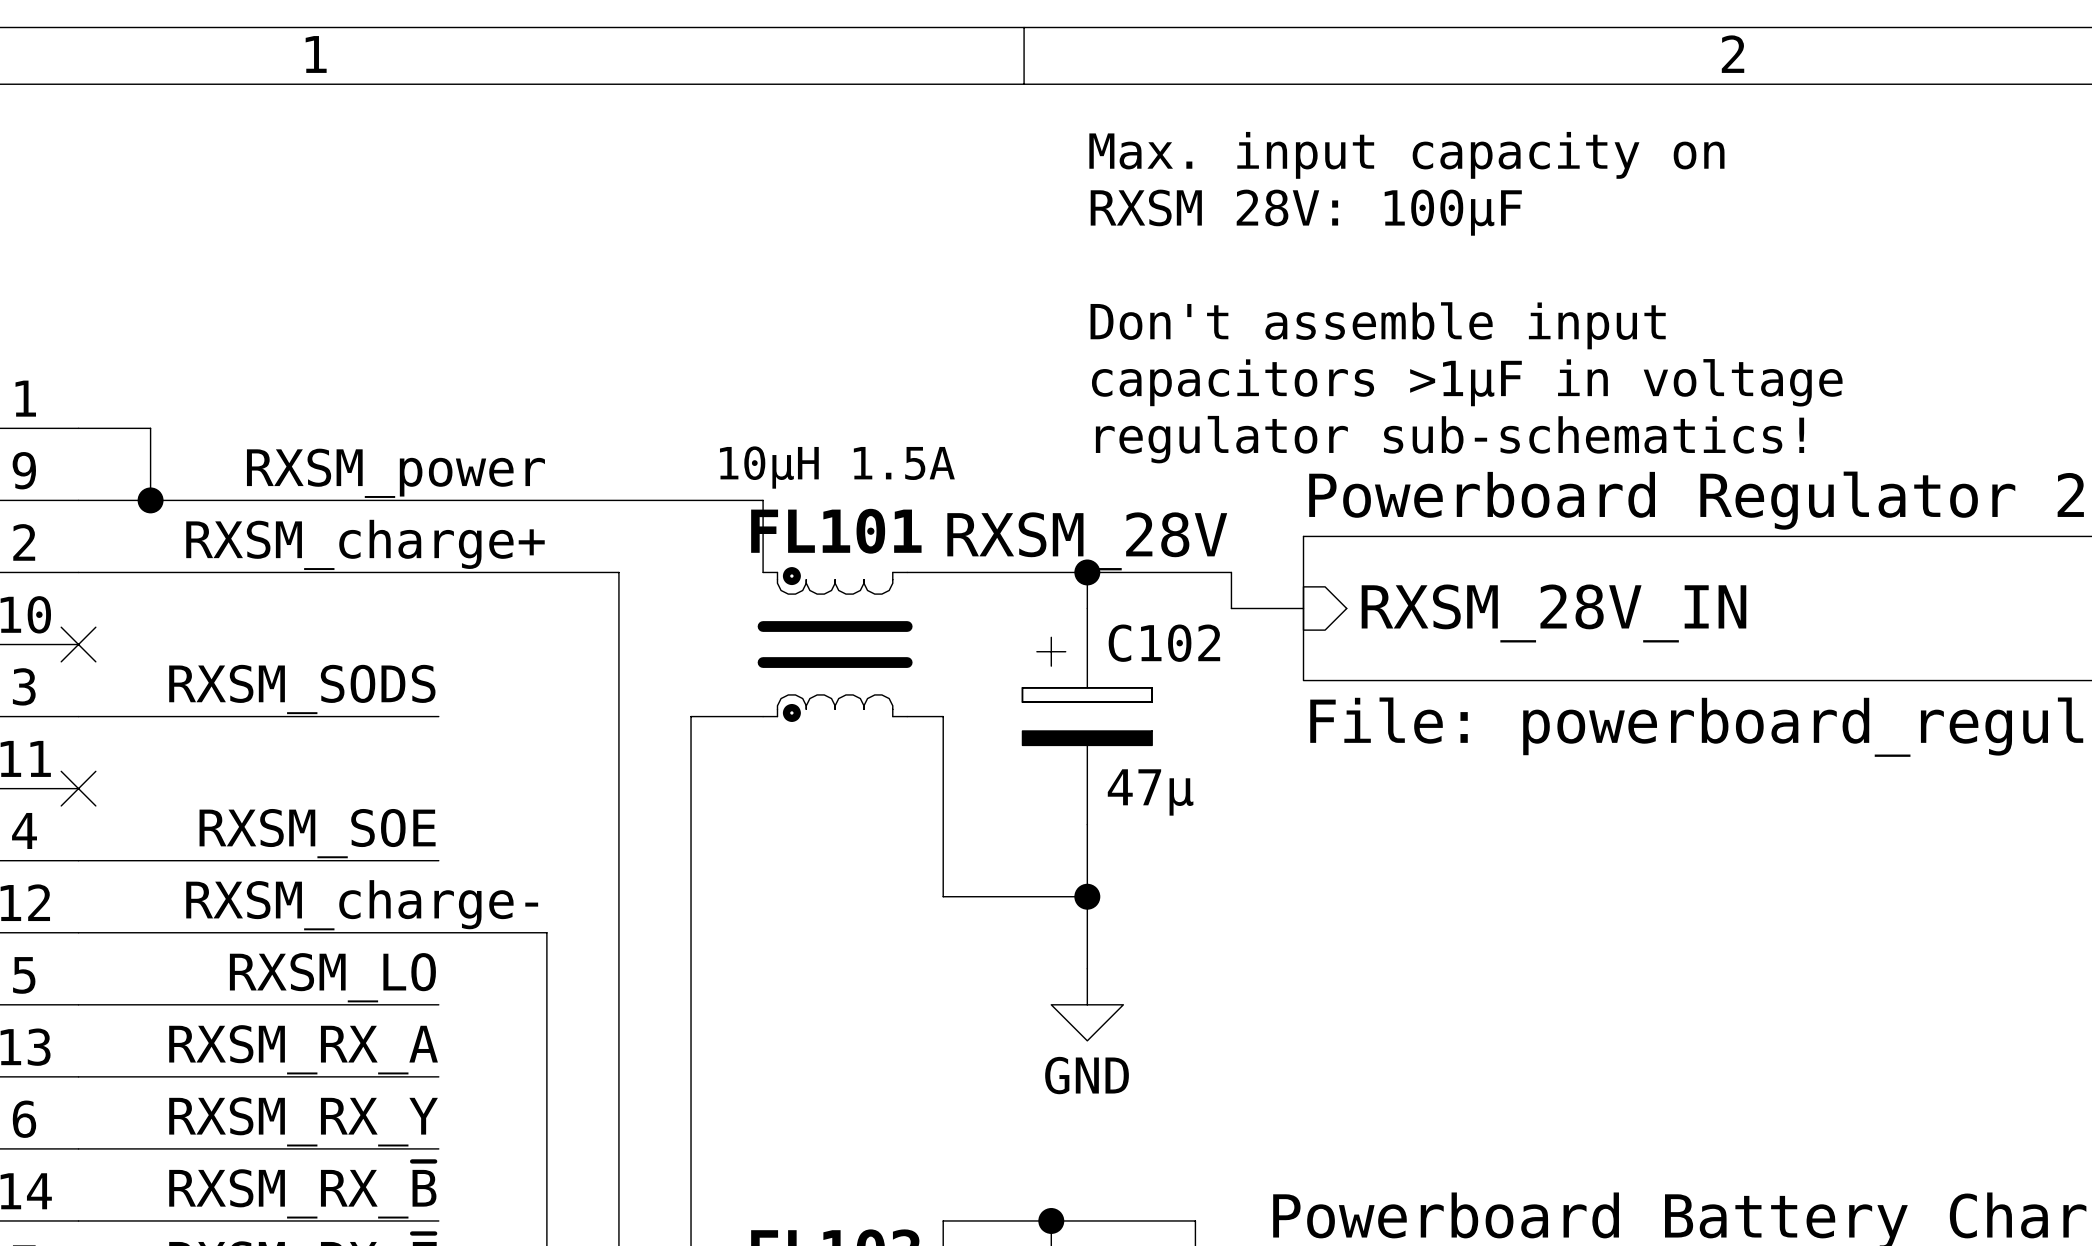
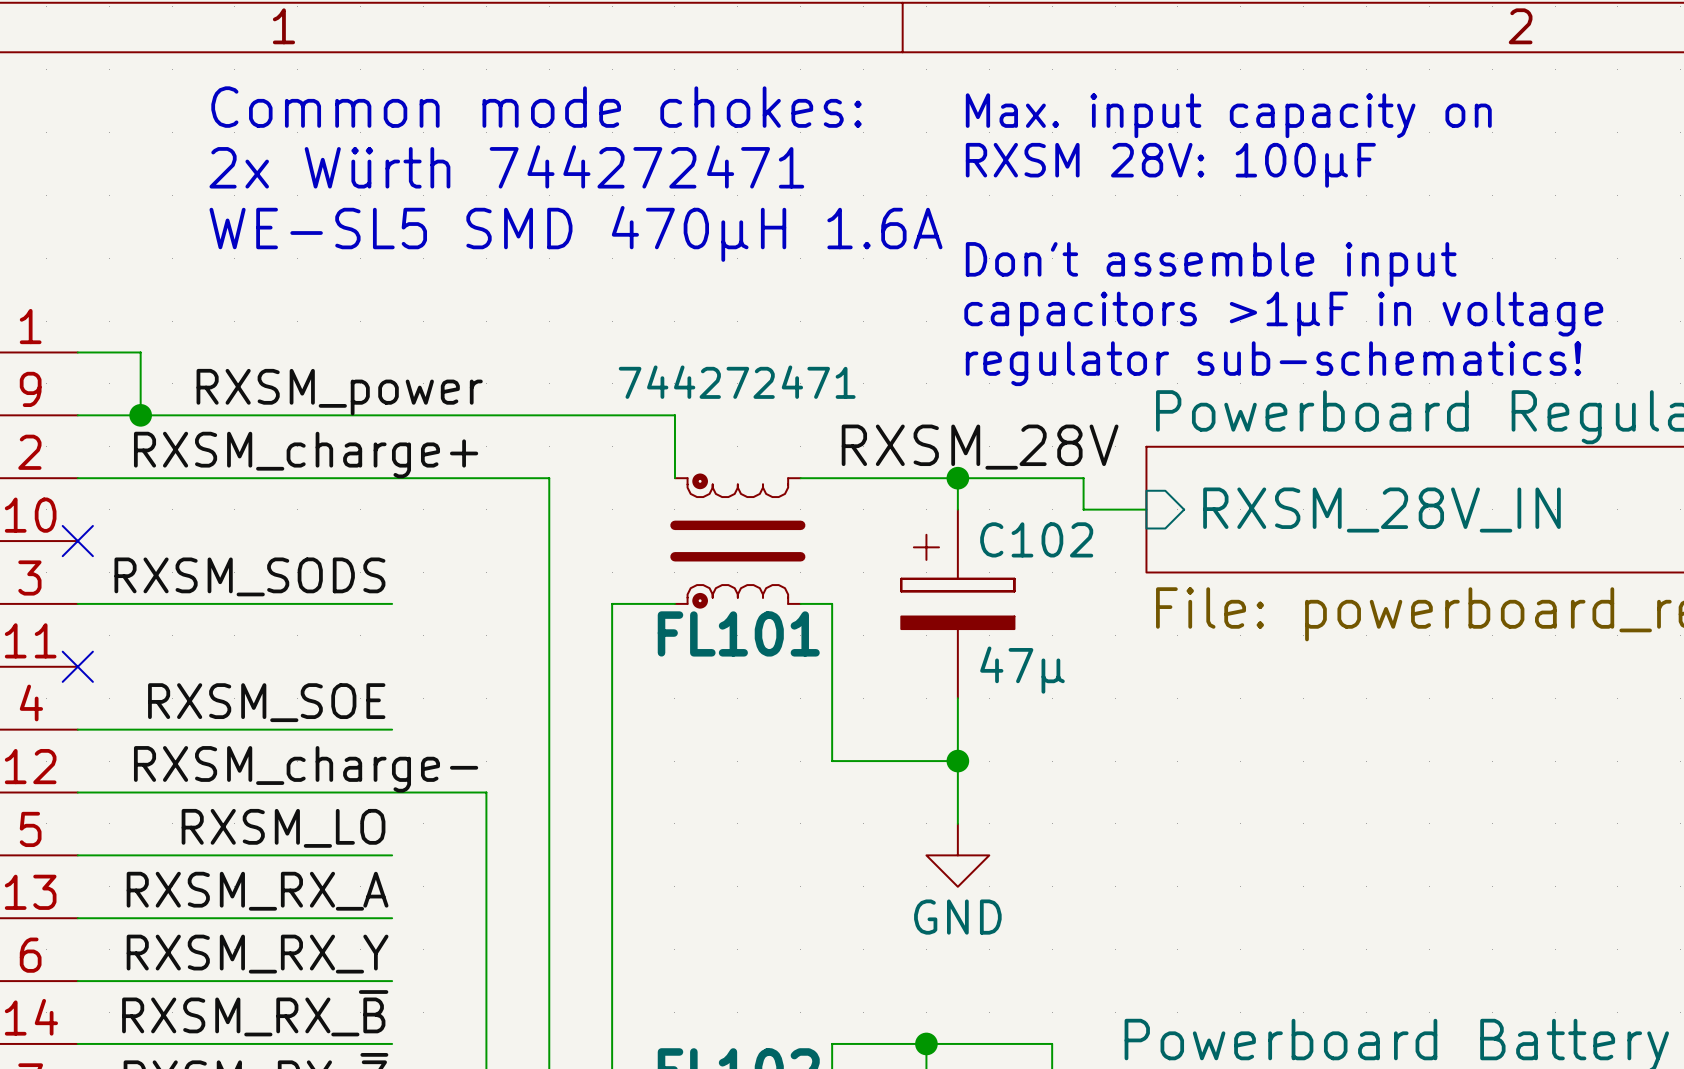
text: none -> Common mode chokes: (536, 107)
text: none -> 2x Würth 744272471 (506, 166)
text: none -> WE-SL5 SMD 470µH 1.6A (575, 233)
FL101 value: 10µH 1.5A (837, 467) -> 744272471 (737, 382)
FL101 name position: FL101 (836, 531) -> FL101 (738, 633)

